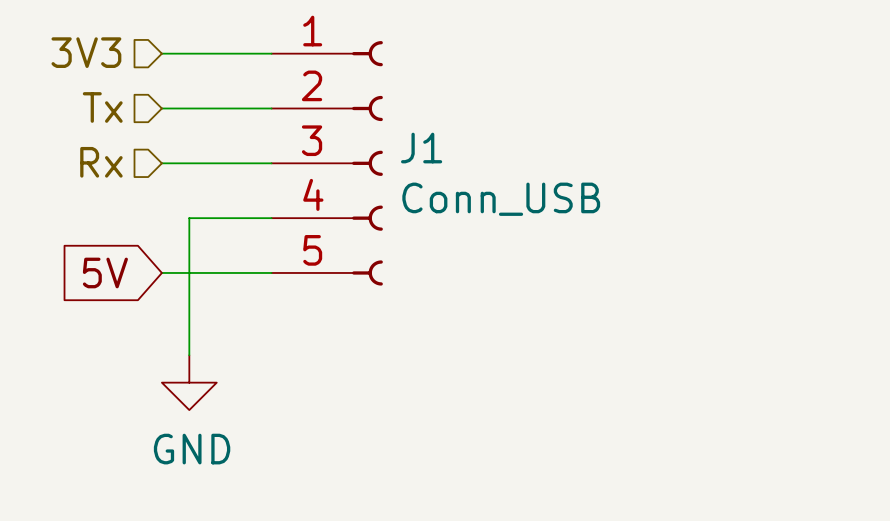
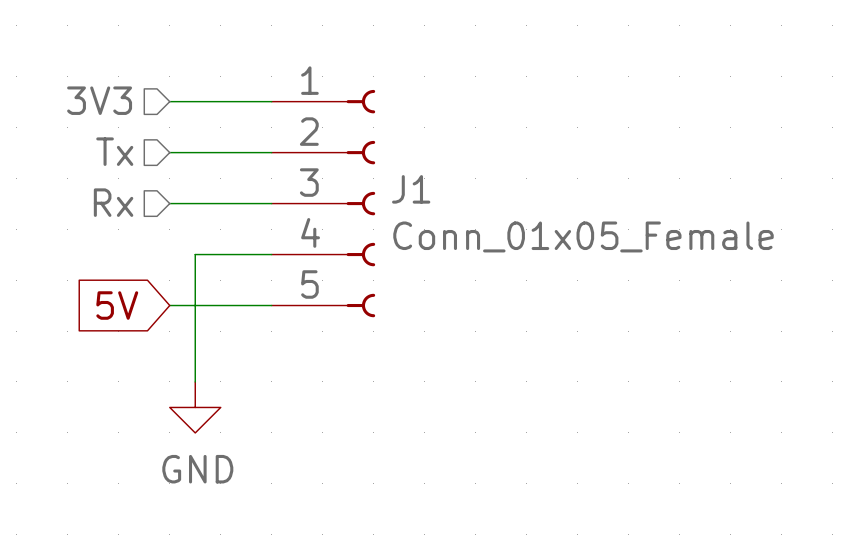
J1 value: Conn_USB (501, 199) -> Conn_01x05_Female (583, 236)

